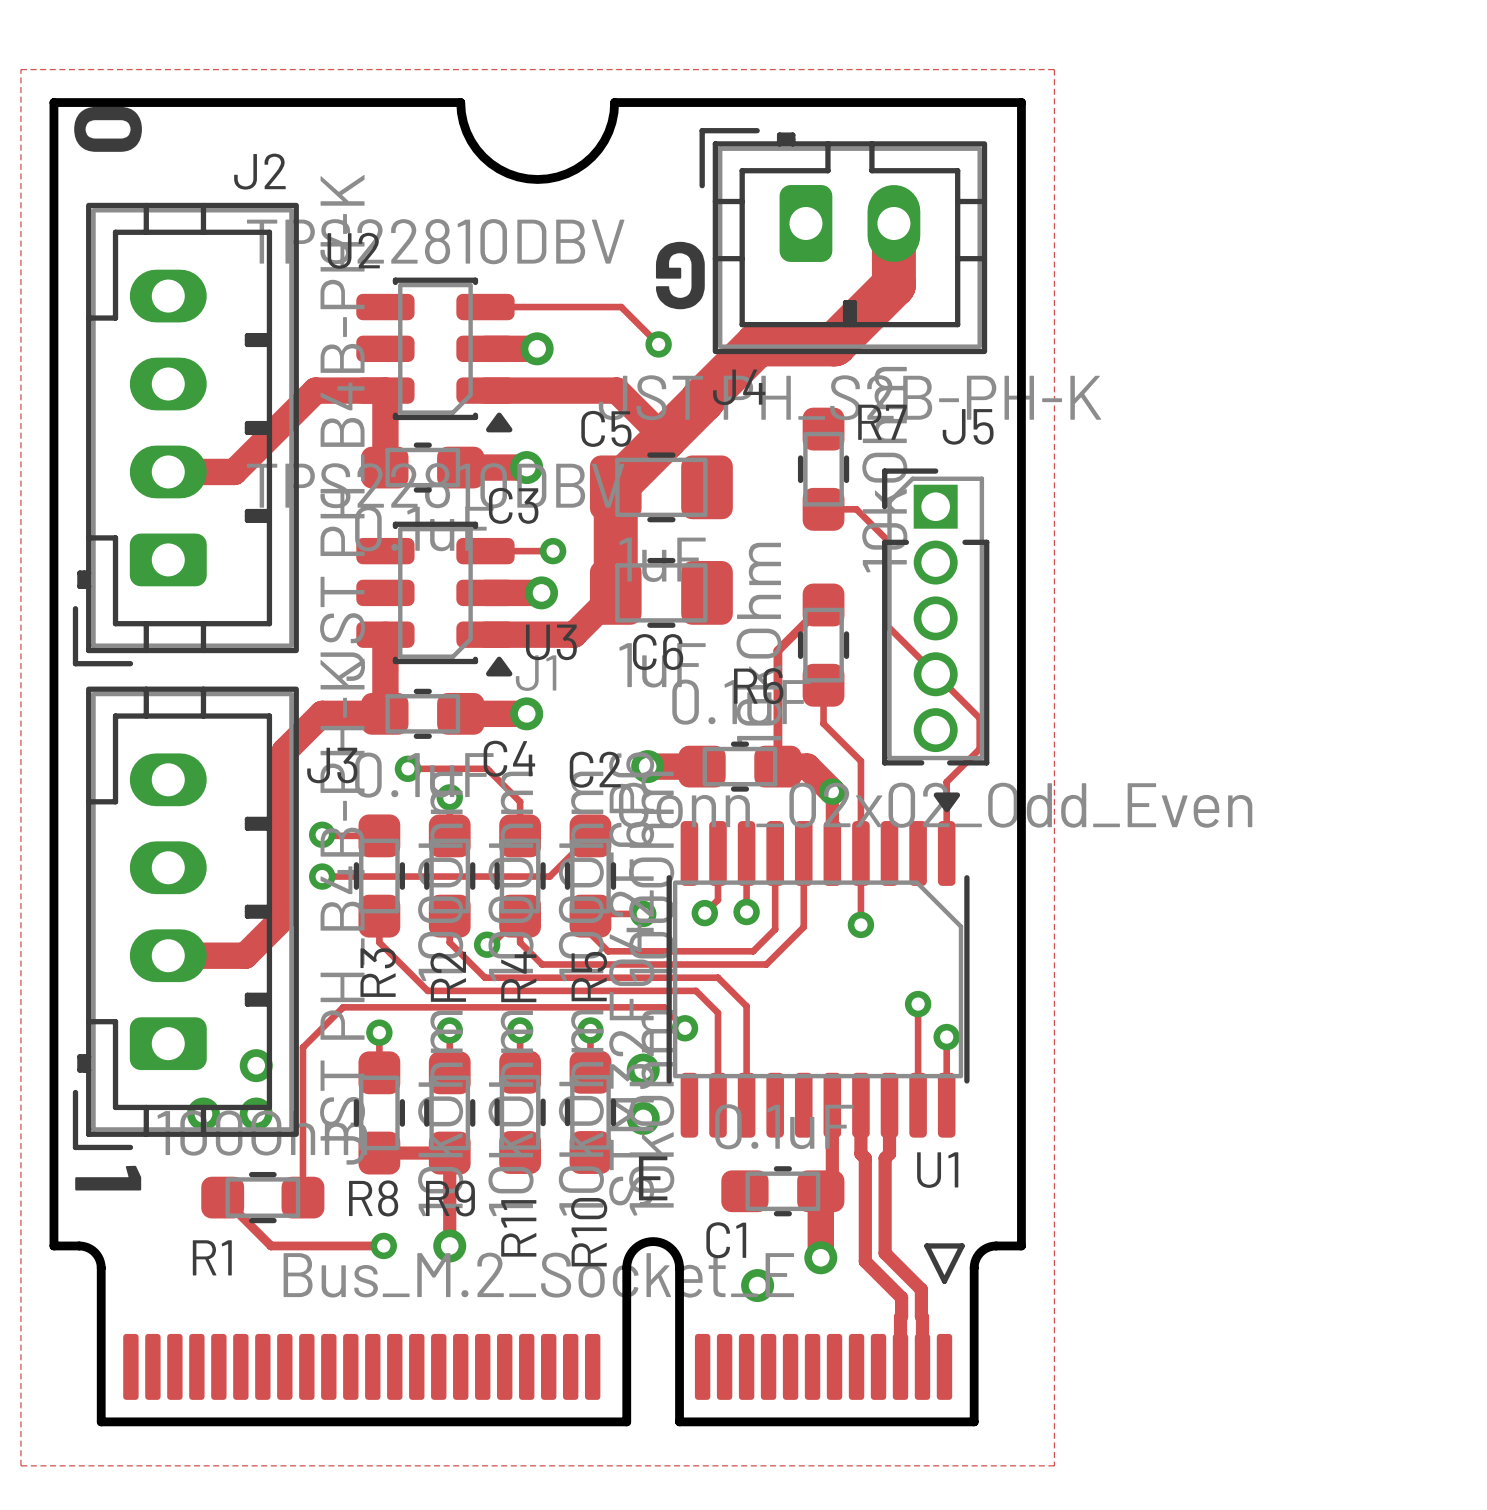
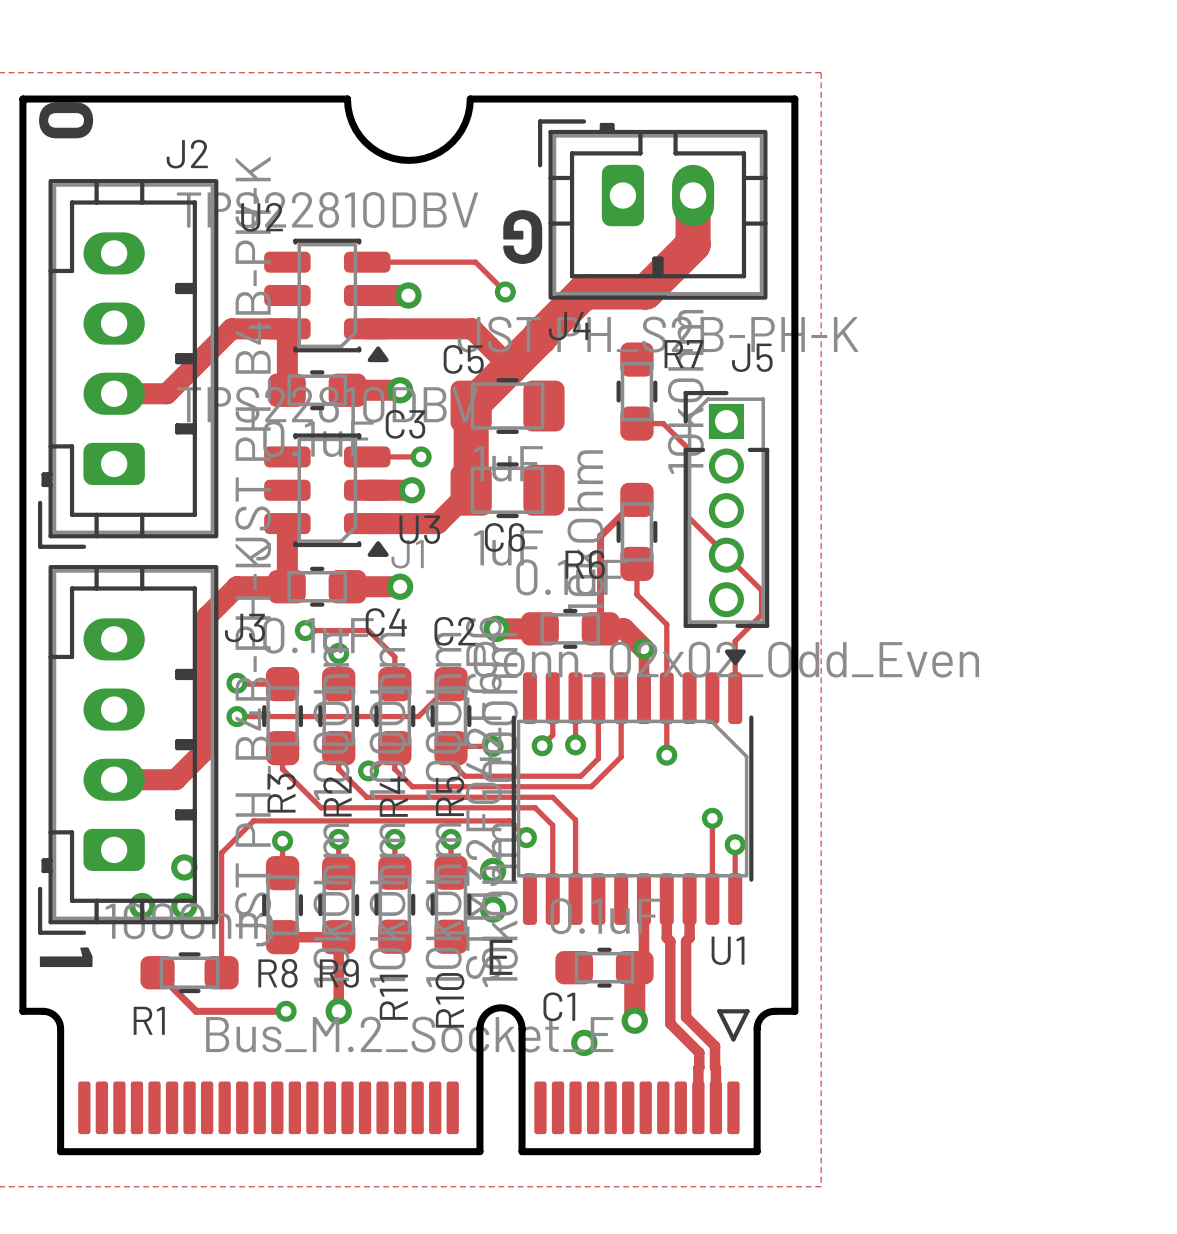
C3 name position: C3 (513, 505) -> C3 (405, 424)

